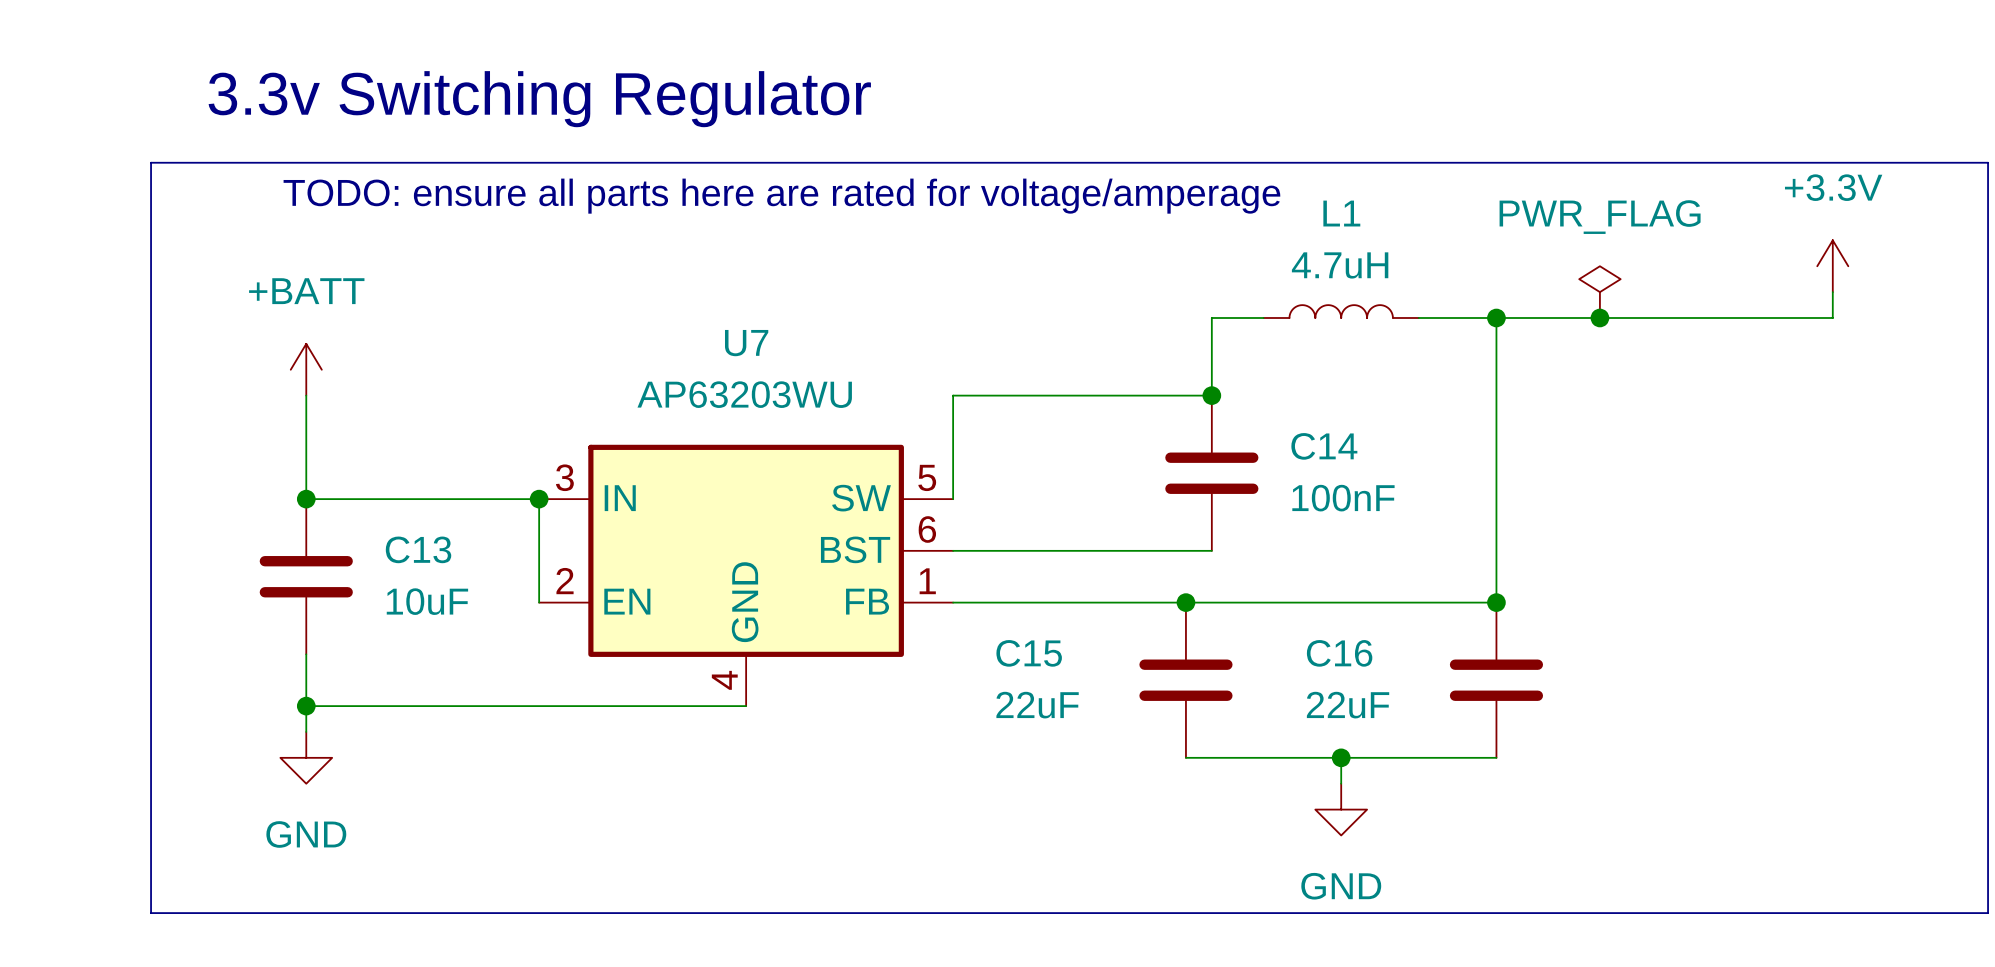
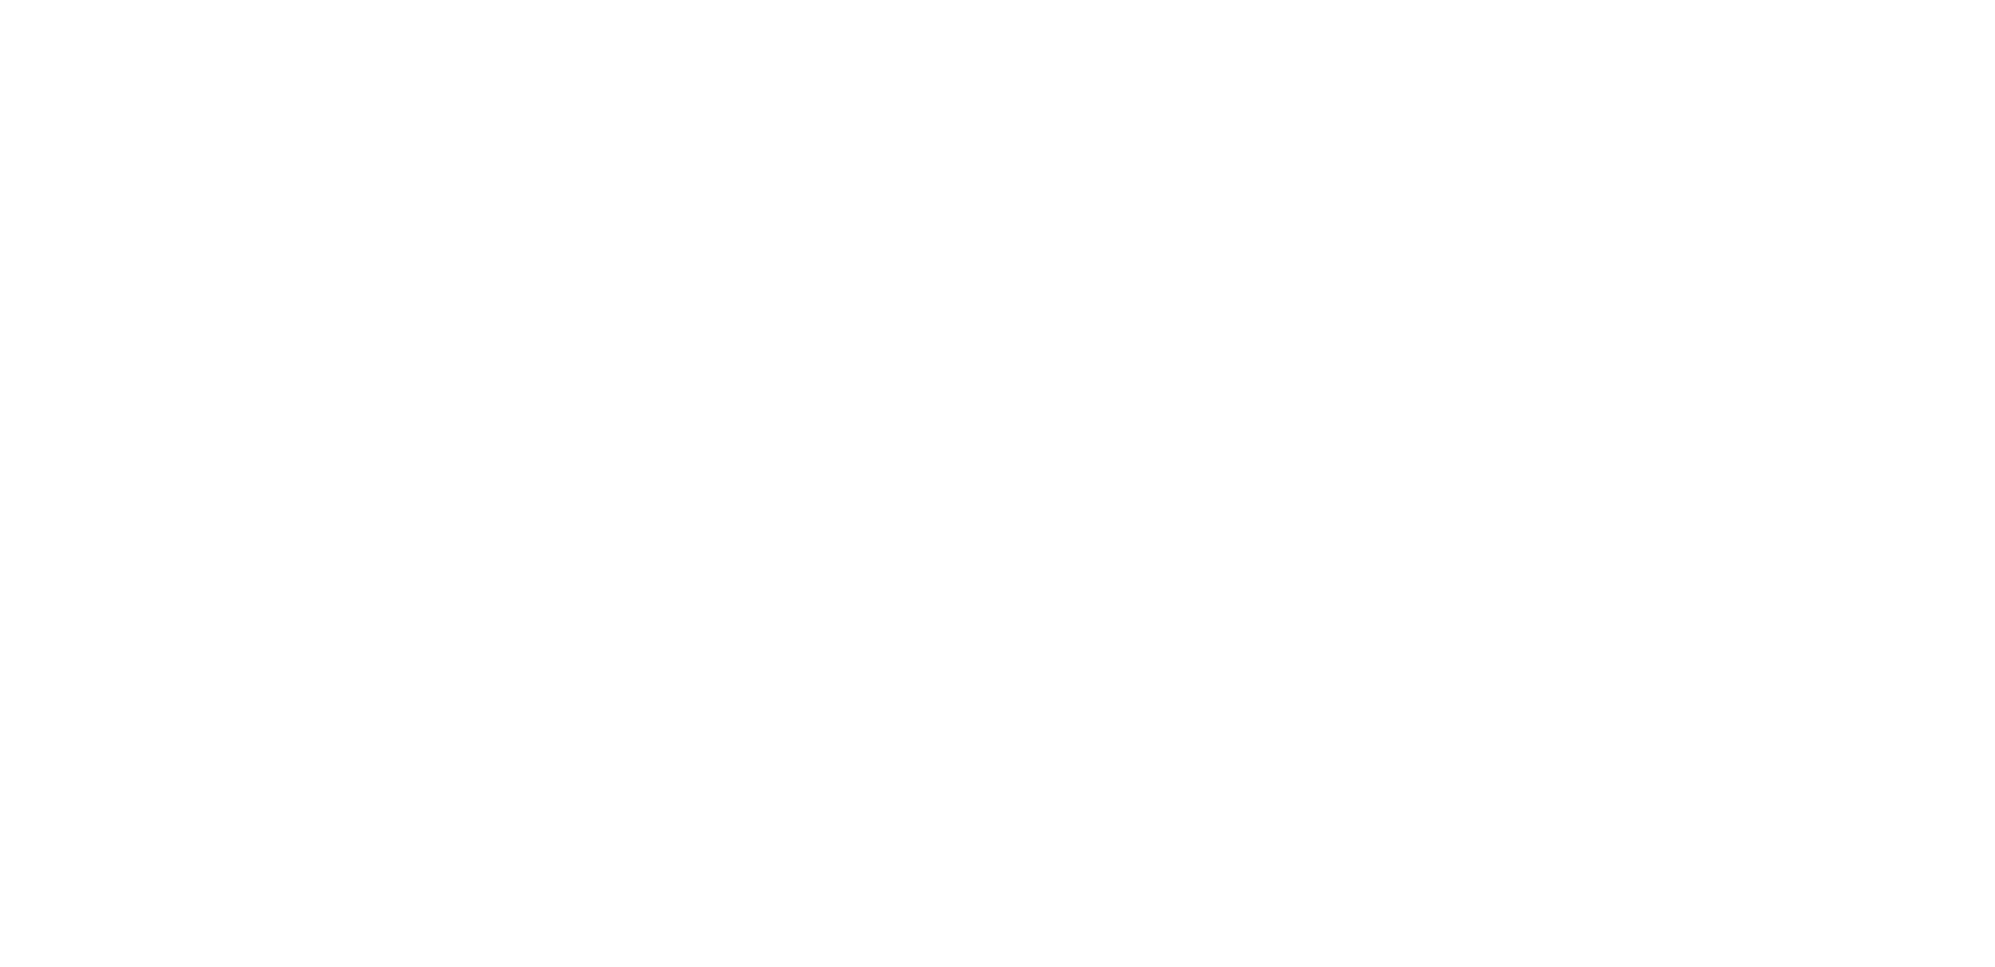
text: 3.3v Switching Regulator (539, 99) -> none
line: (151, 162) (1988, 162) (1988, 913) (151, 913) (151, 162) -> none
text: TODO: ensure all parts here are rated for voltage/amperage (781, 196) -> none
power symbol: +3.3V (1832, 266) -> none
power symbol: PWR_FLAG (1599, 292) -> none
wire: (1832, 292) (1832, 317) (1418, 317) -> none
L1: 4.7uH (1341, 311) -> none
wire: (1263, 317) (1211, 317) (1211, 395) (953, 395) (953, 499) -> none
wire: (1496, 317) (1496, 602) (953, 602) -> none
junction: (1496, 317) -> none
junction: (1599, 317) -> none
power symbol: +BATT (306, 369) -> none
wire: (306, 395) (306, 499) (539, 499) (539, 602) -> none
junction: (1211, 395) -> none
C14: 100nF (1211, 473) -> none
junction: (306, 499) -> none
junction: (539, 499) -> none
wire: (953, 550) (1211, 550) -> none
U7: AP63203WU (746, 575) -> none
C13: 10uF (306, 576) -> none
junction: (1185, 602) -> none
junction: (1496, 602) -> none
wire: (306, 654) (306, 731) -> none
C15: 22uF (1185, 680) -> none
C16: 22uF (1496, 680) -> none
wire: (306, 706) (746, 706) -> none
junction: (306, 706) -> none
power symbol: GND (306, 757) -> none
wire: (1185, 757) (1496, 757) -> none
wire: (1341, 757) (1341, 783) -> none
junction: (1341, 757) -> none
power symbol: GND (1341, 809) -> none

